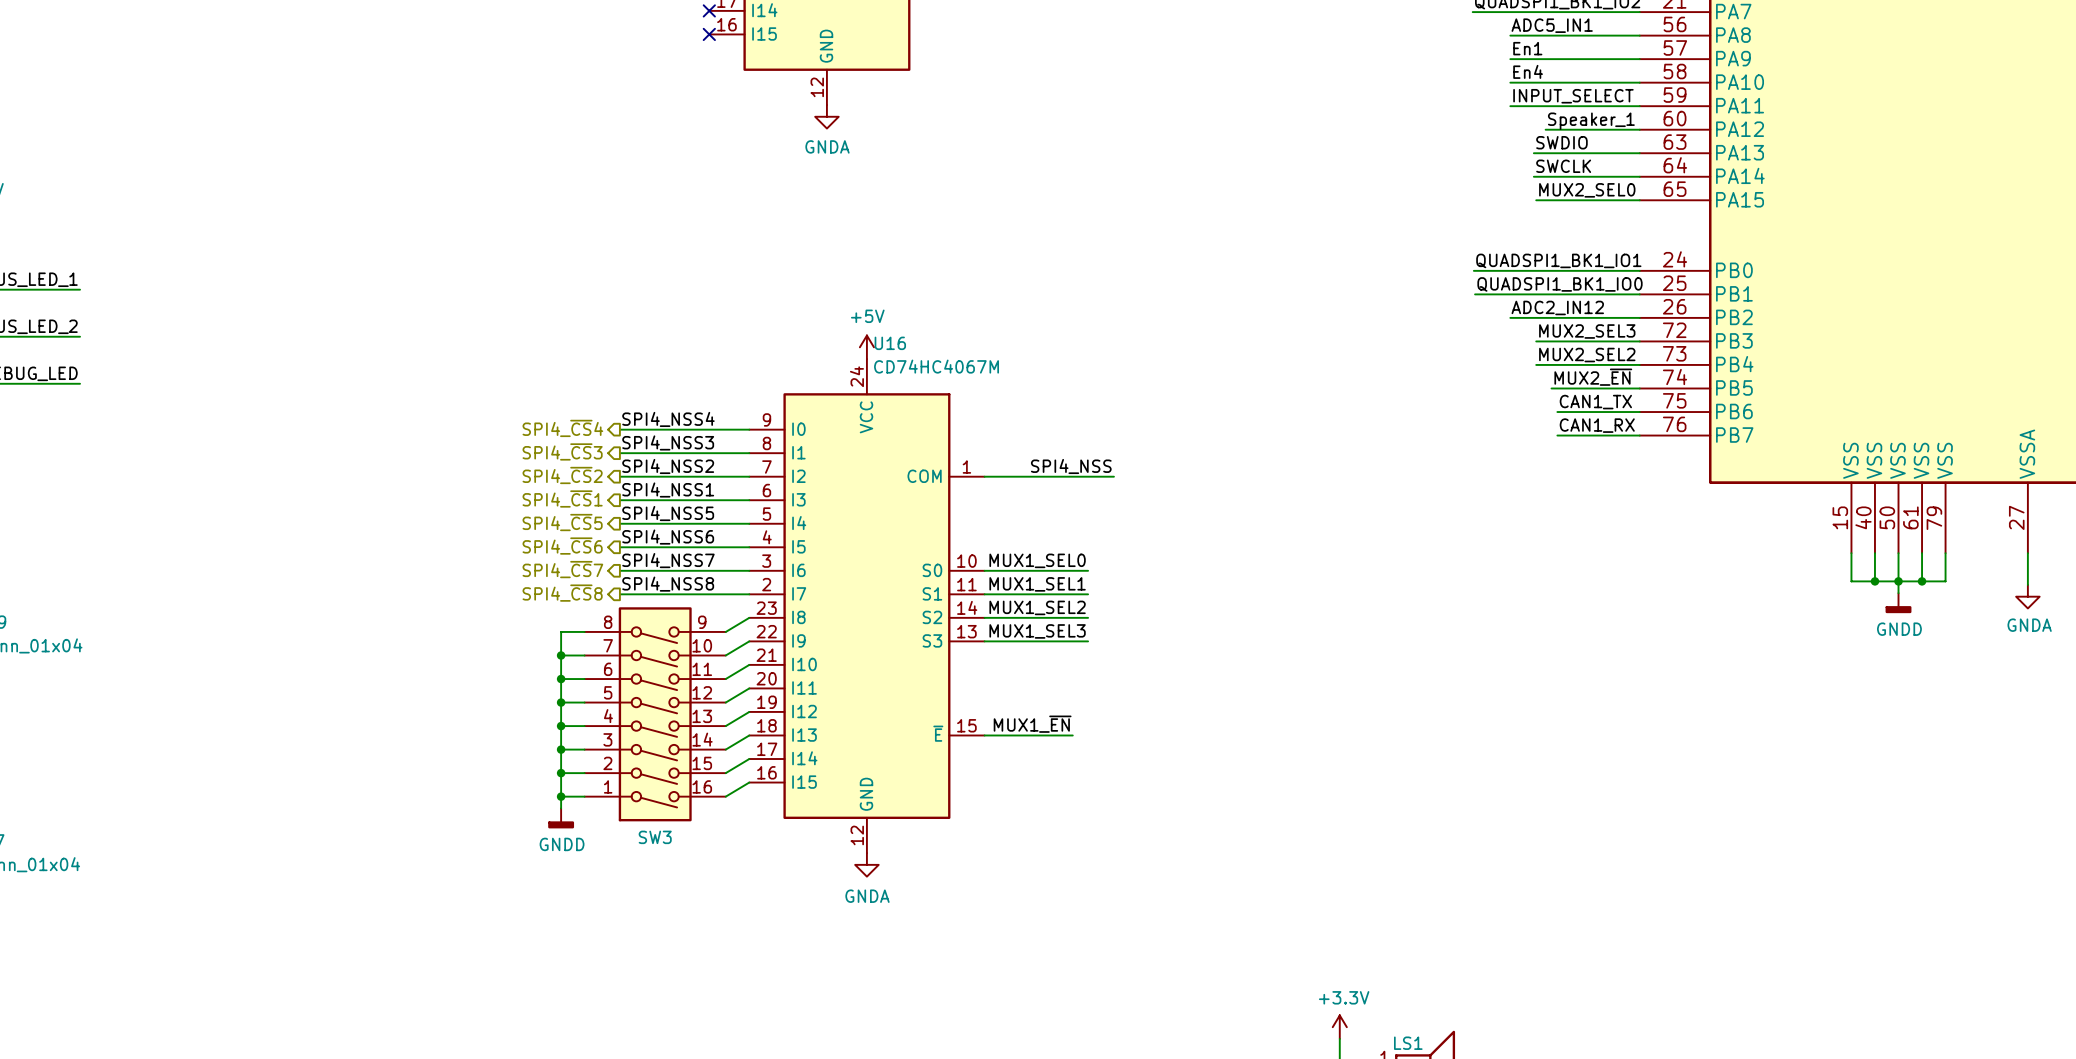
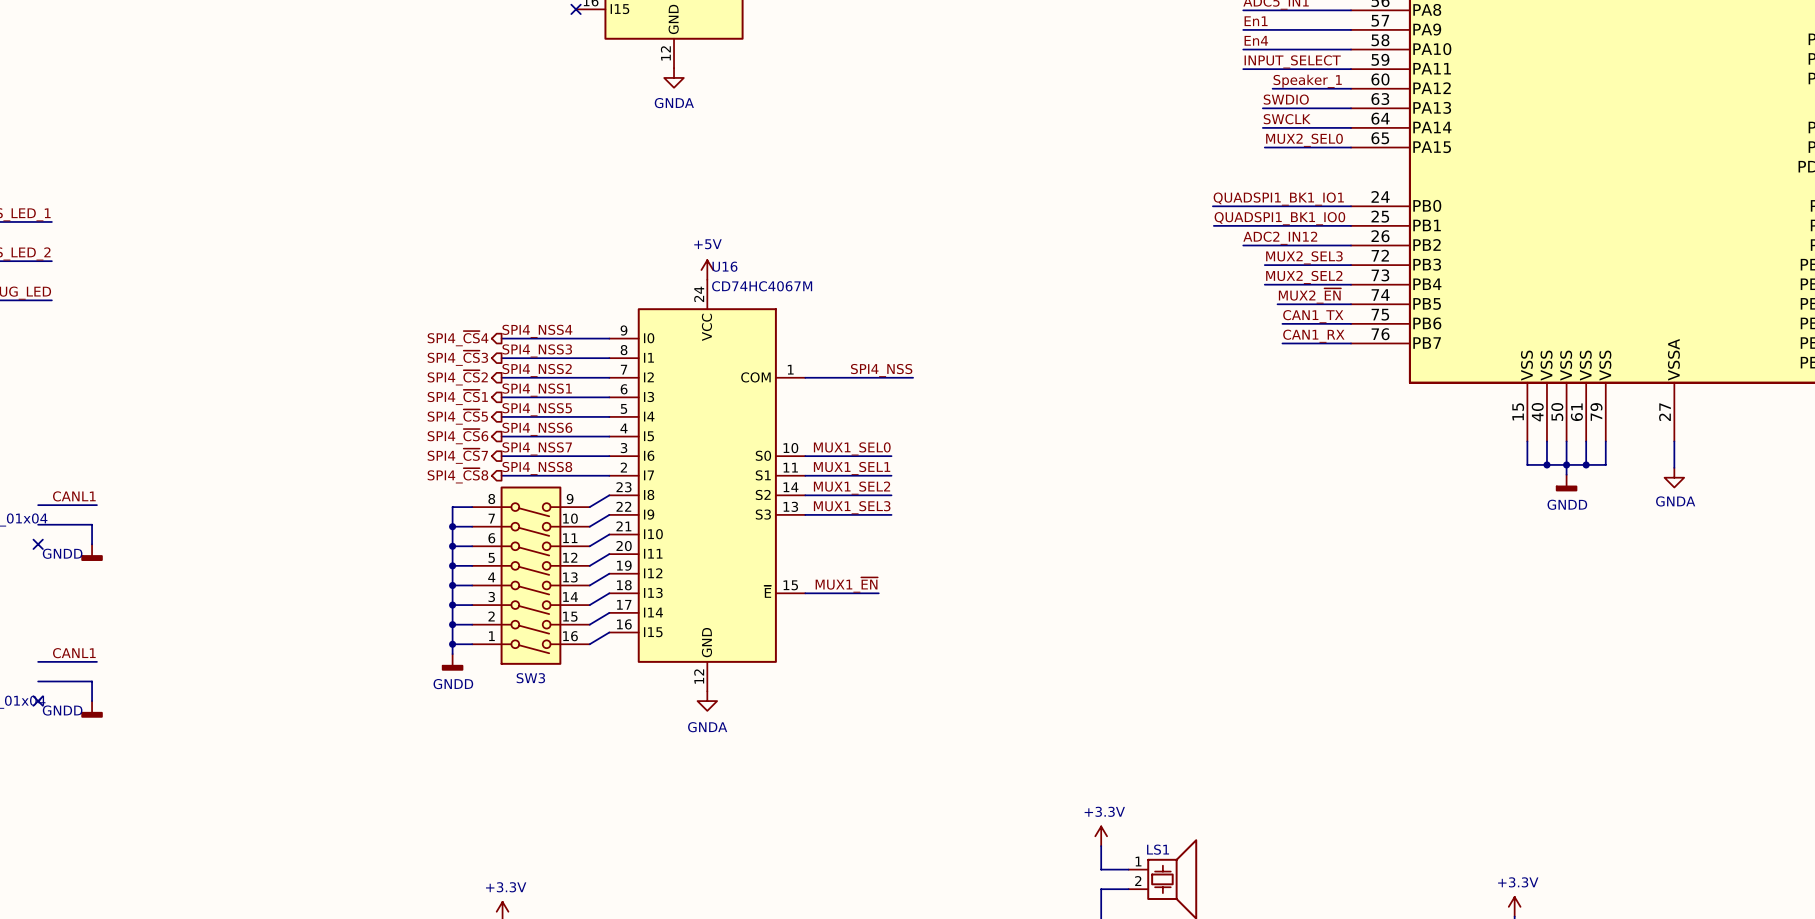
label: none -> CANL1 (74, 496)
wire: none -> (38, 505) (96, 505)
wire: none -> (38, 524) (92, 524) (92, 544)
no-connect mark: none -> (38, 544)
power symbol: none -> GNDD (92, 552)
label: none -> CANL1 (74, 653)
wire: none -> (38, 661) (96, 661)
wire: none -> (38, 681) (92, 681) (92, 701)
no-connect mark: none -> (38, 701)
power symbol: none -> GNDD (92, 709)

